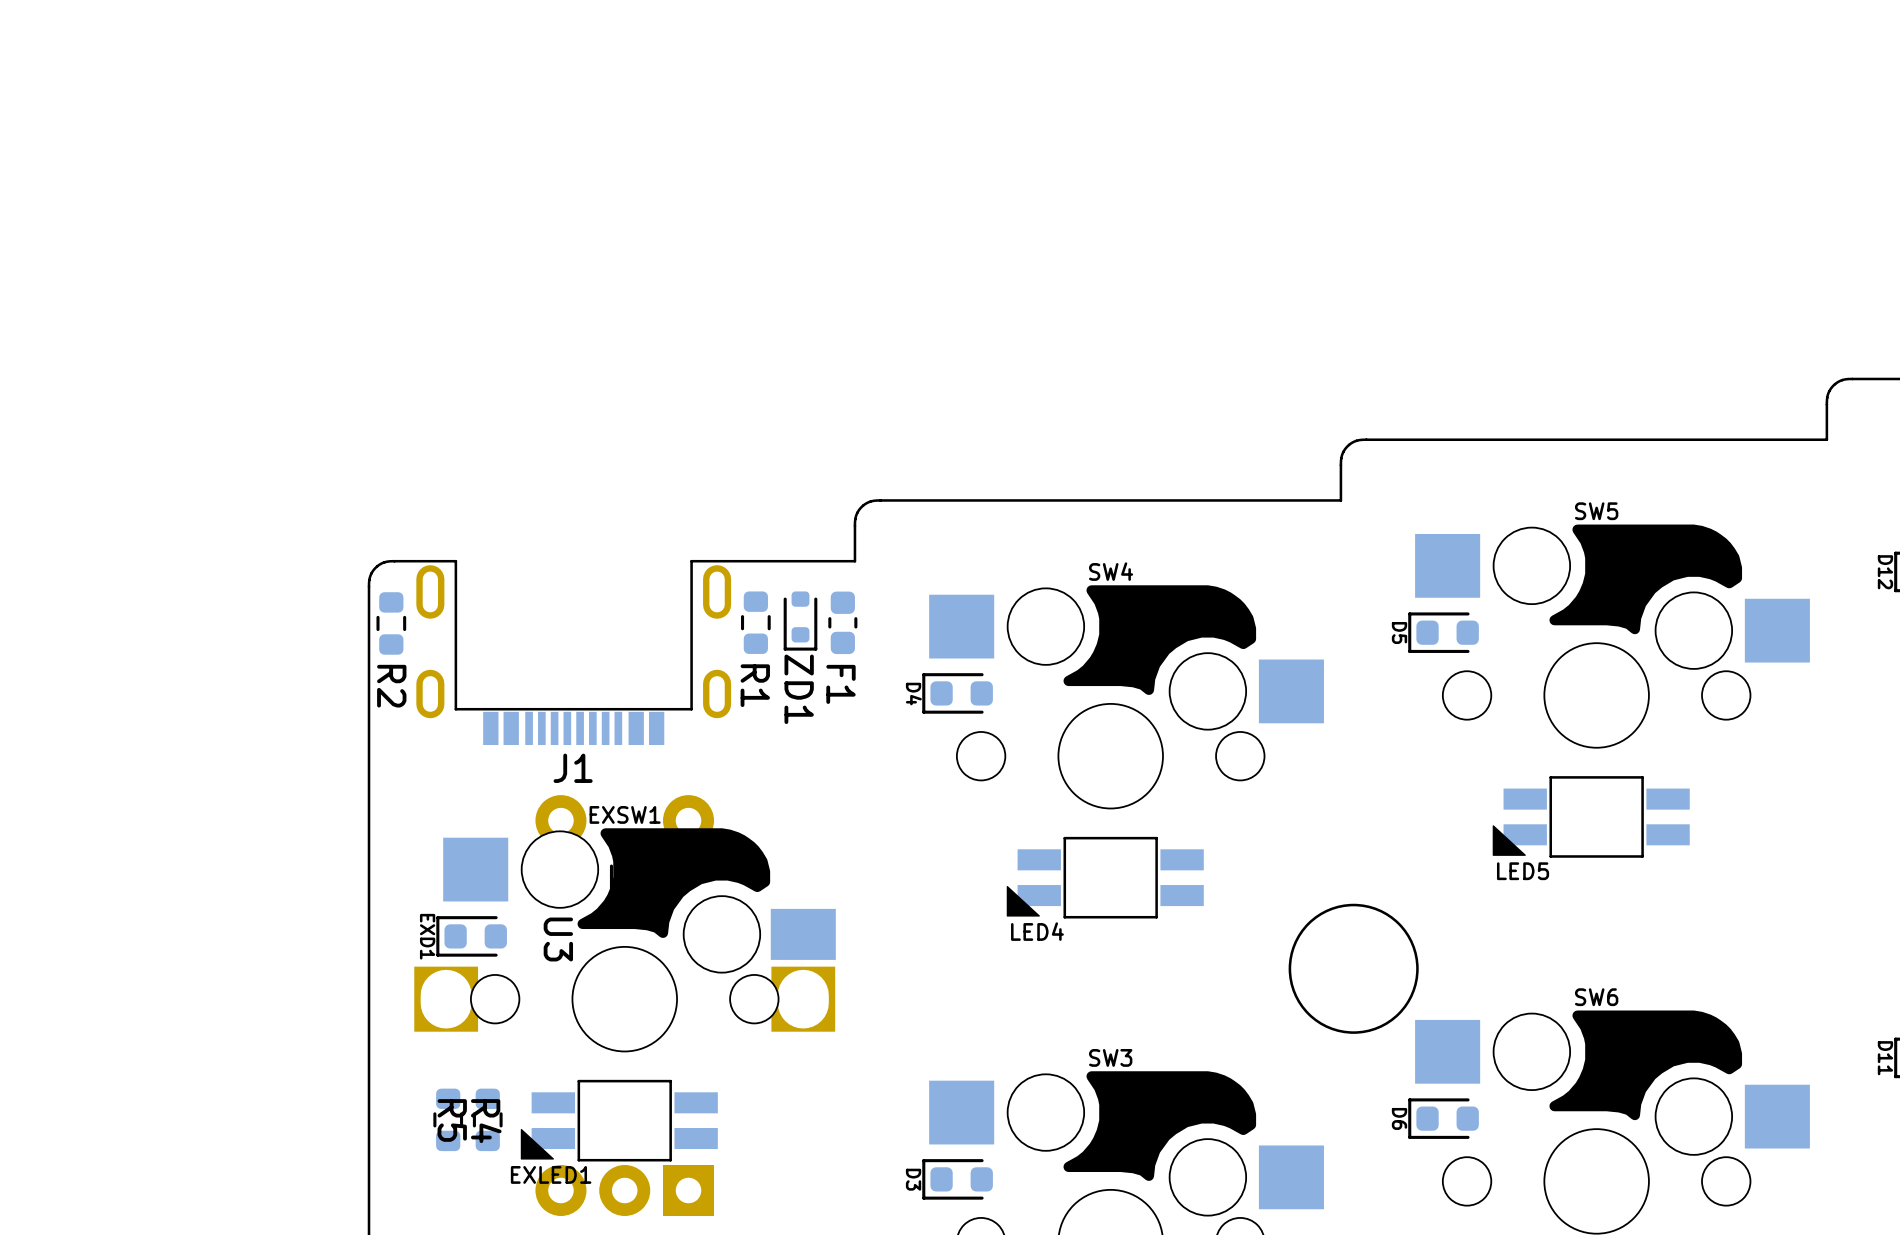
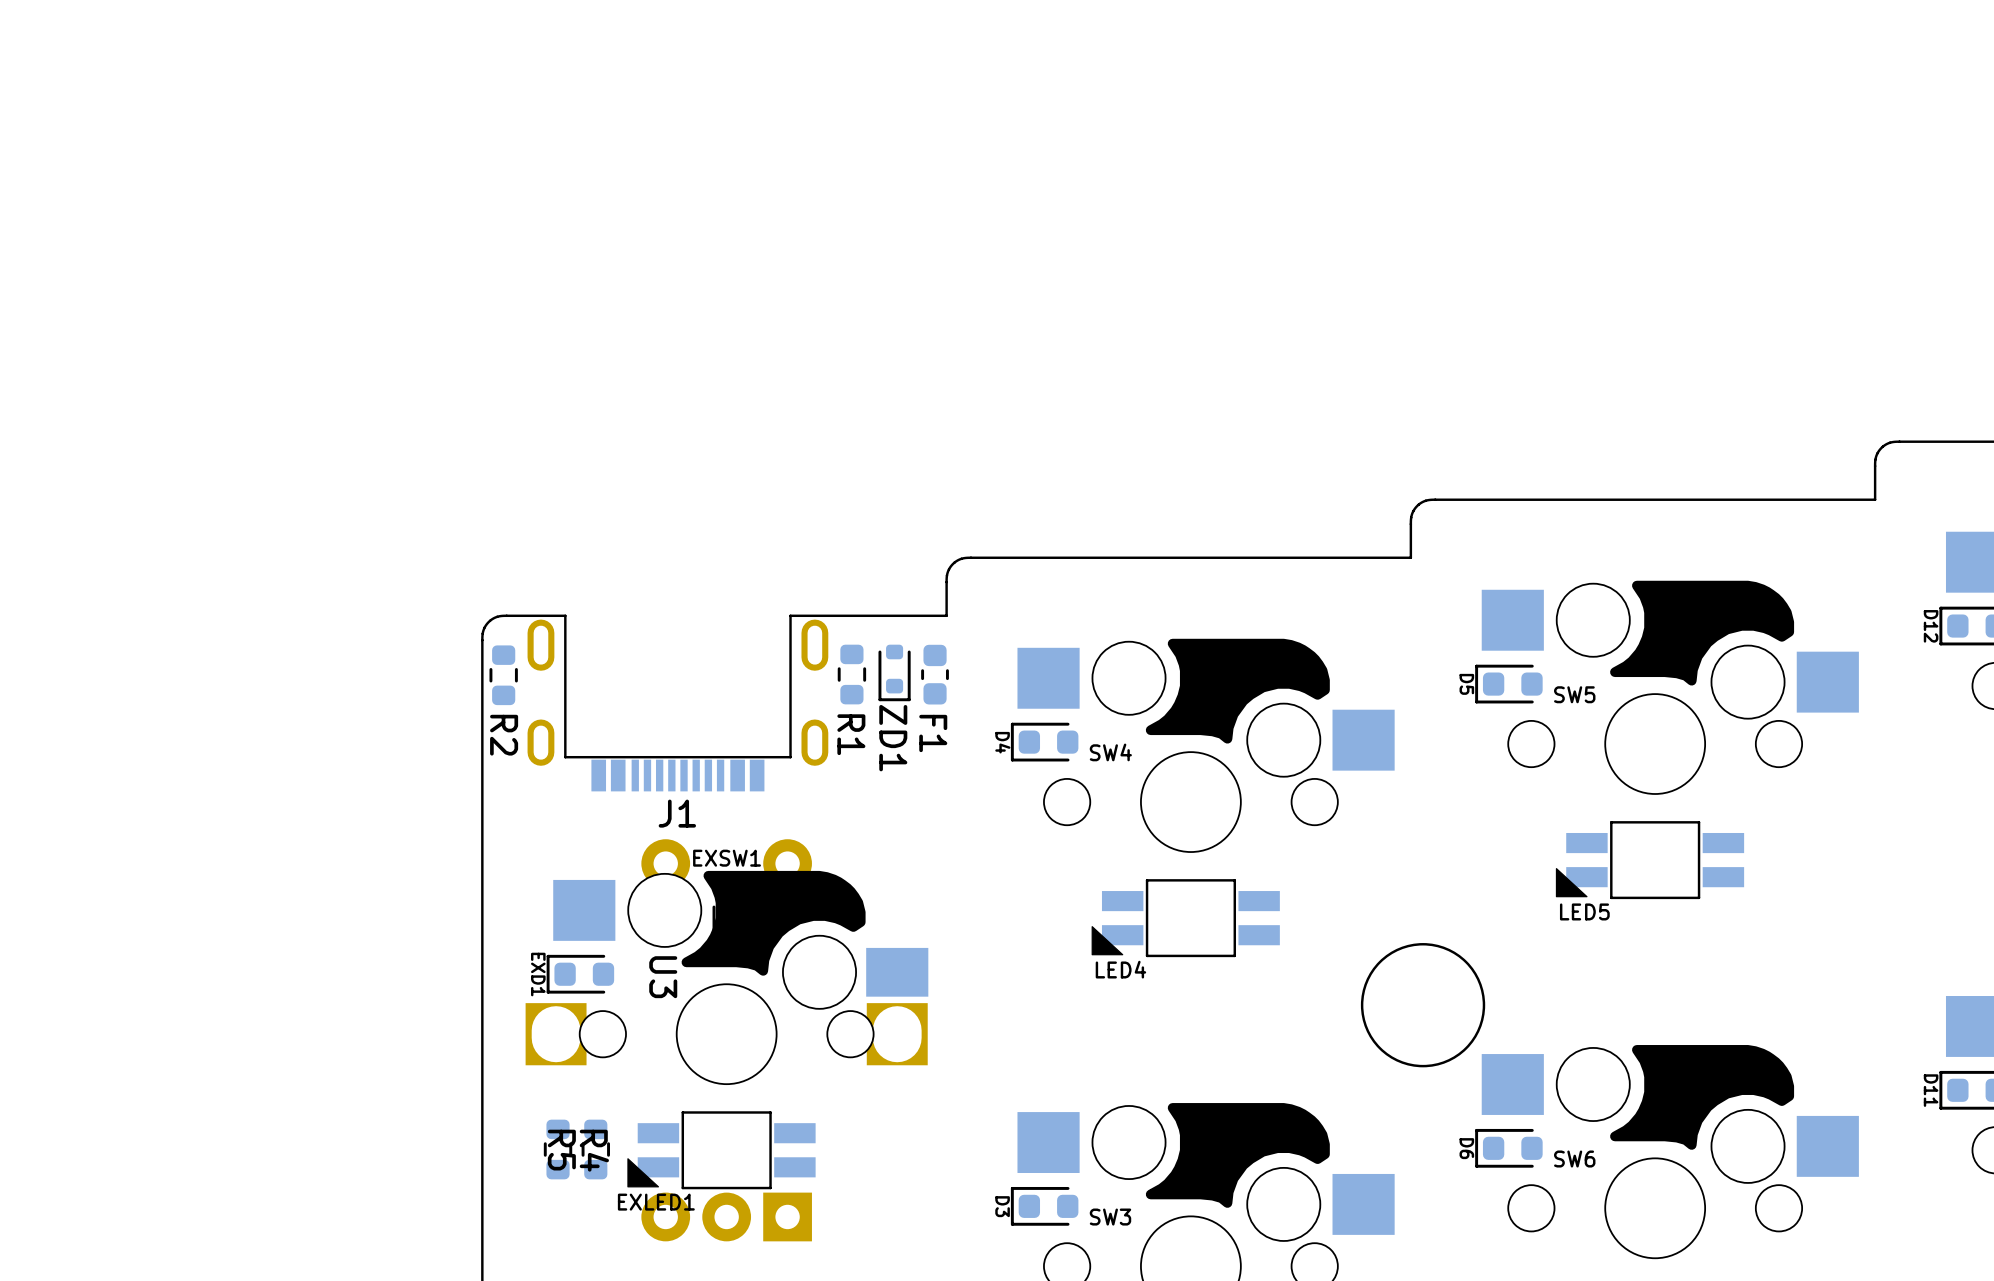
SW5 name position: SW5 (1596, 511) -> SW5 (1574, 694)
SW4 name position: SW4 (1111, 571) -> SW4 (1110, 752)
SW6 name position: SW6 (1596, 997) -> SW6 (1574, 1159)
SW3 name position: SW3 (1110, 1057) -> SW3 (1110, 1217)

